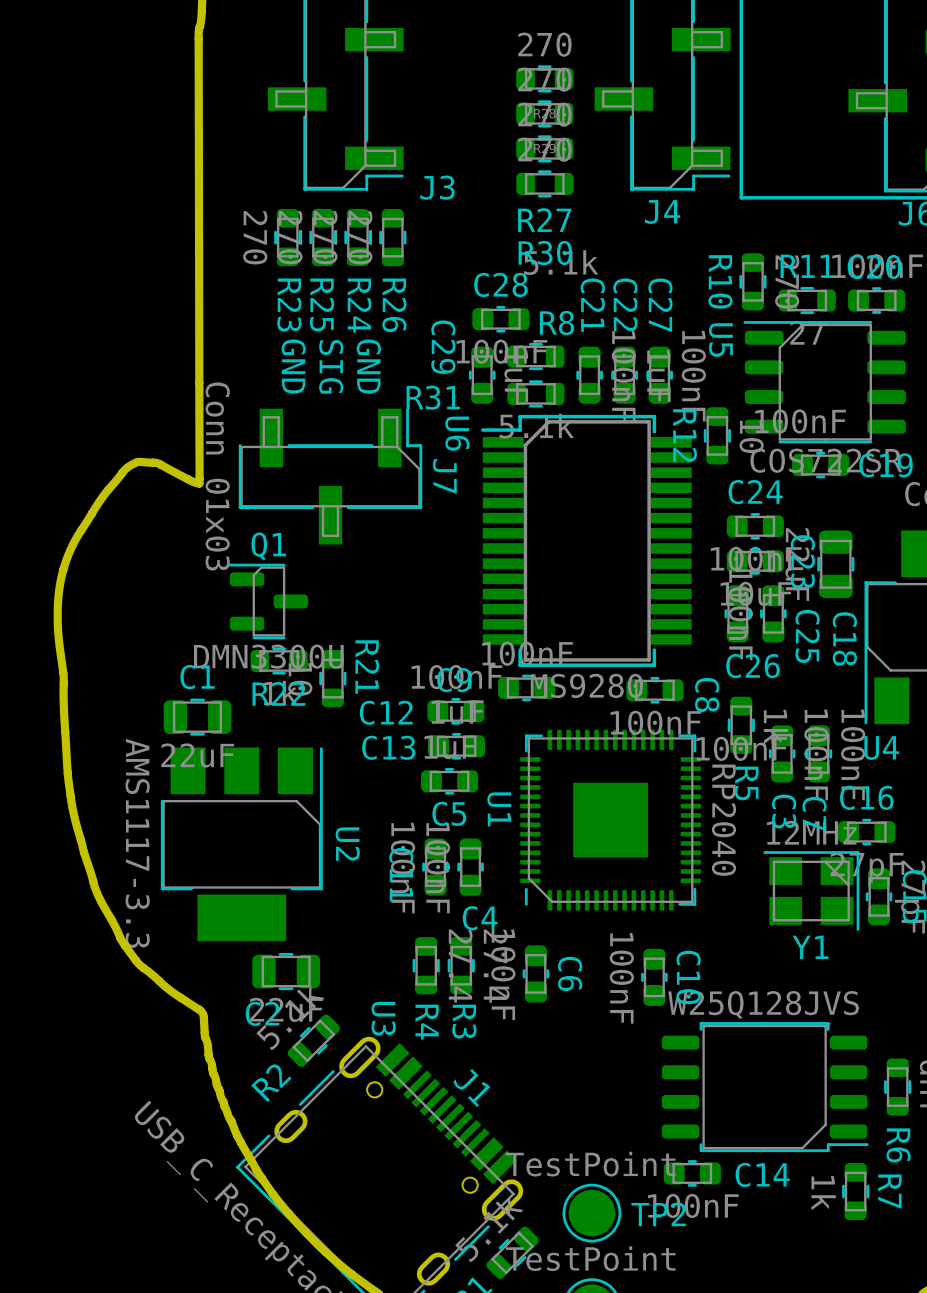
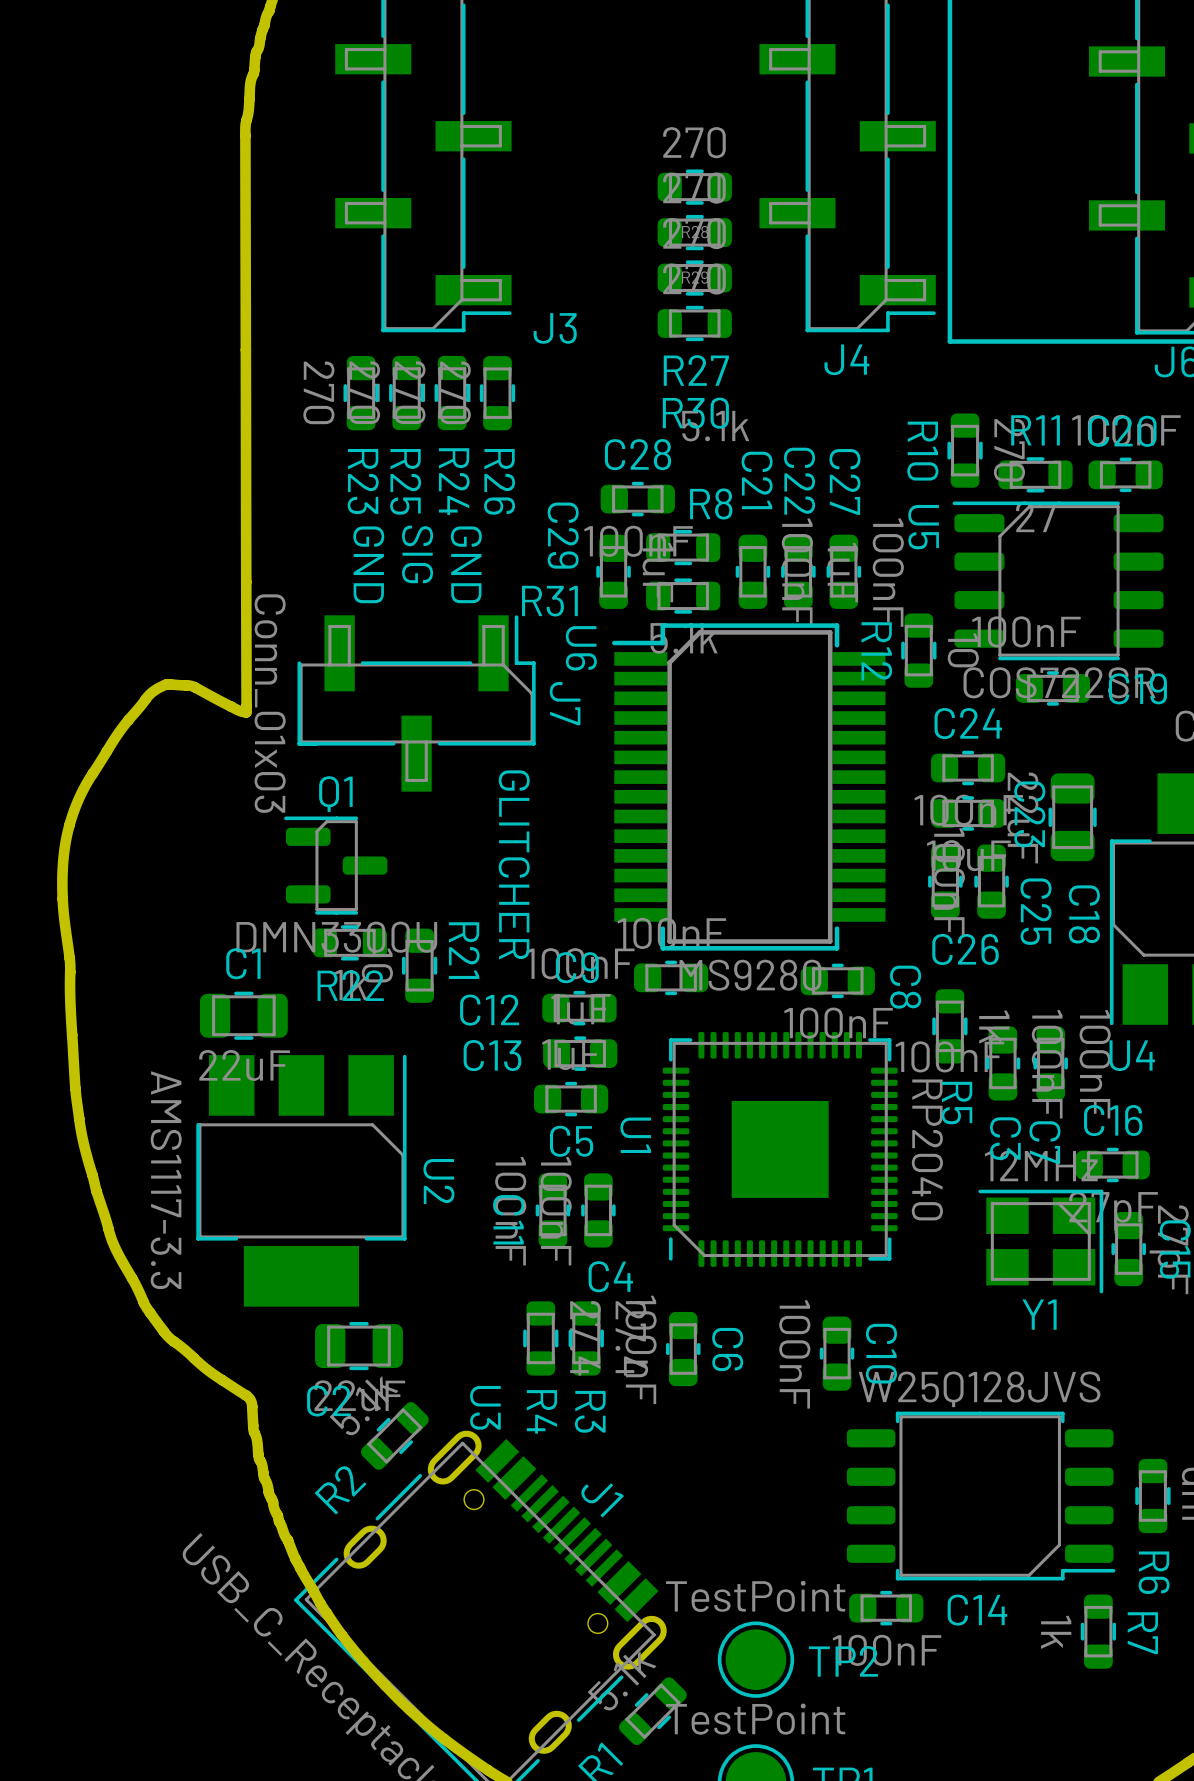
text: none -> GLITCHER (514, 864)

